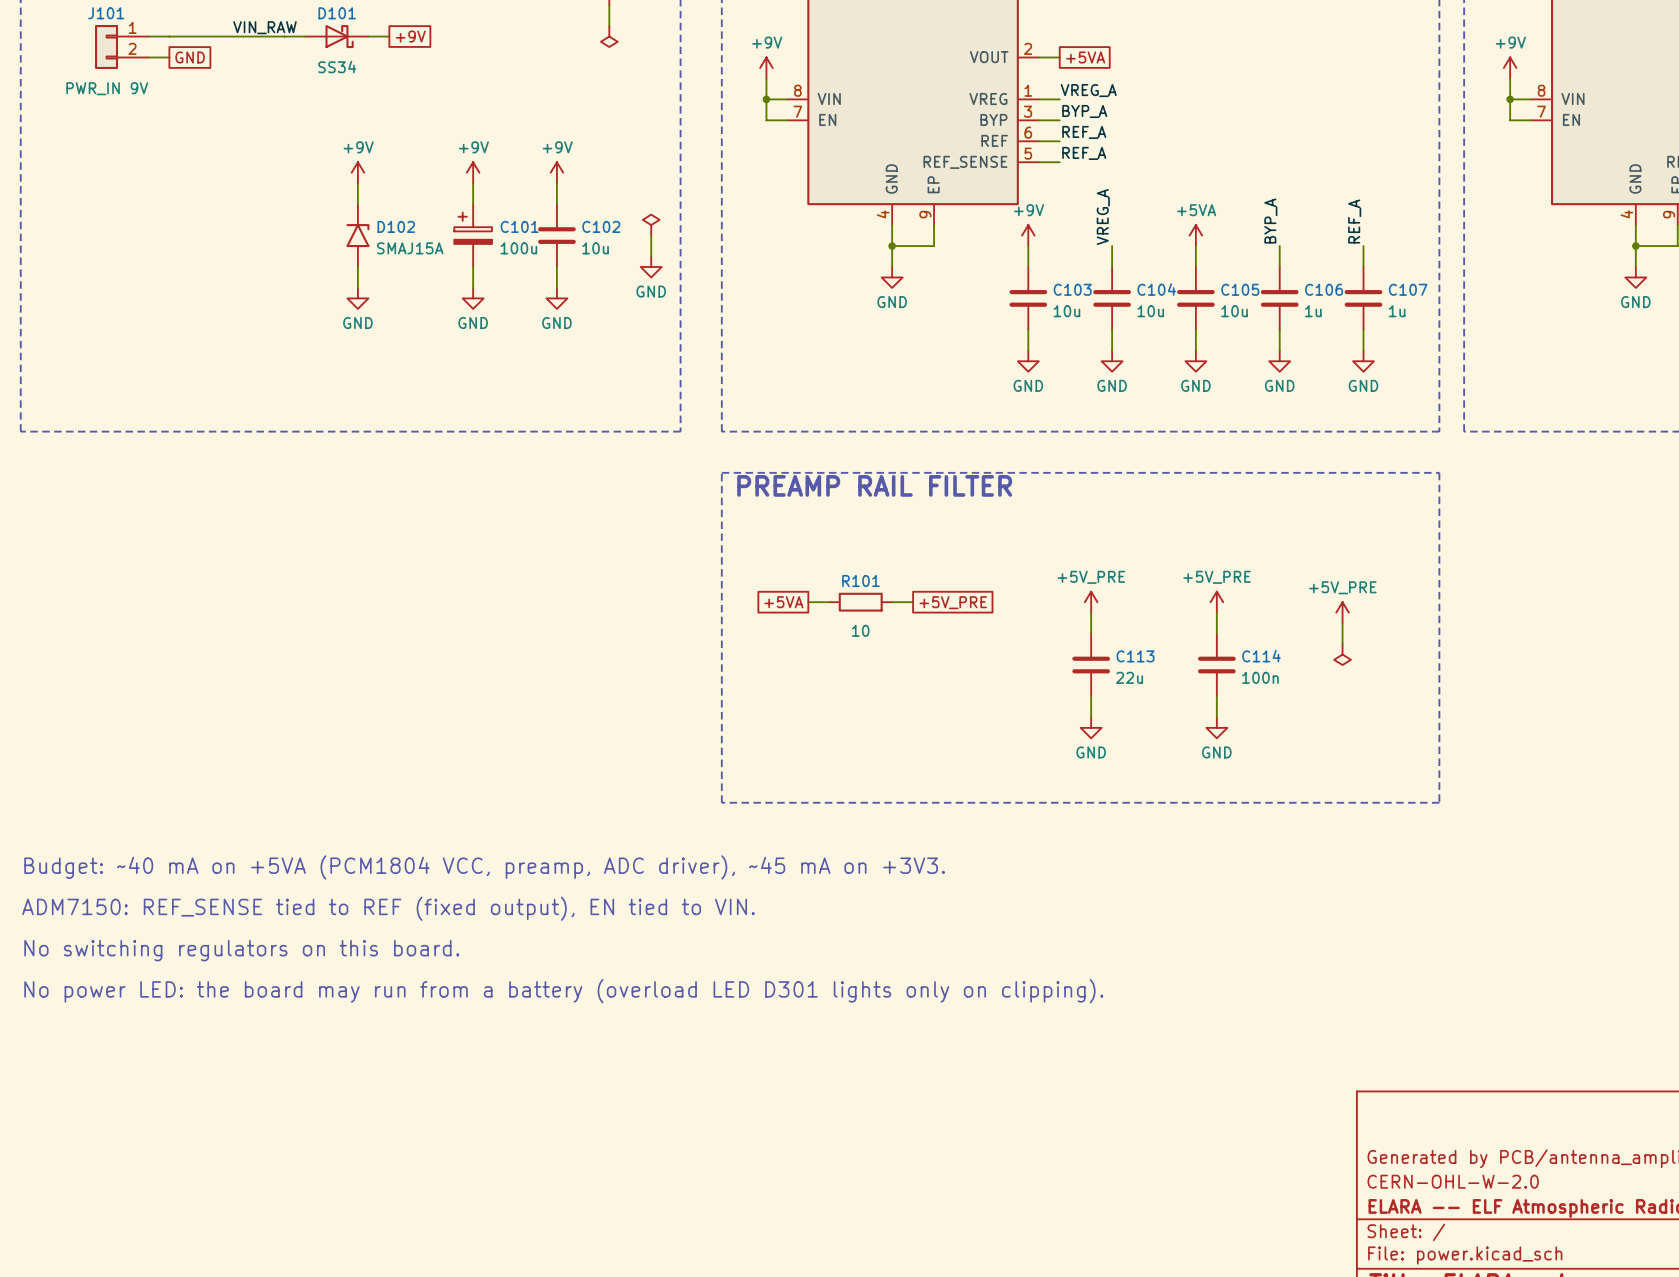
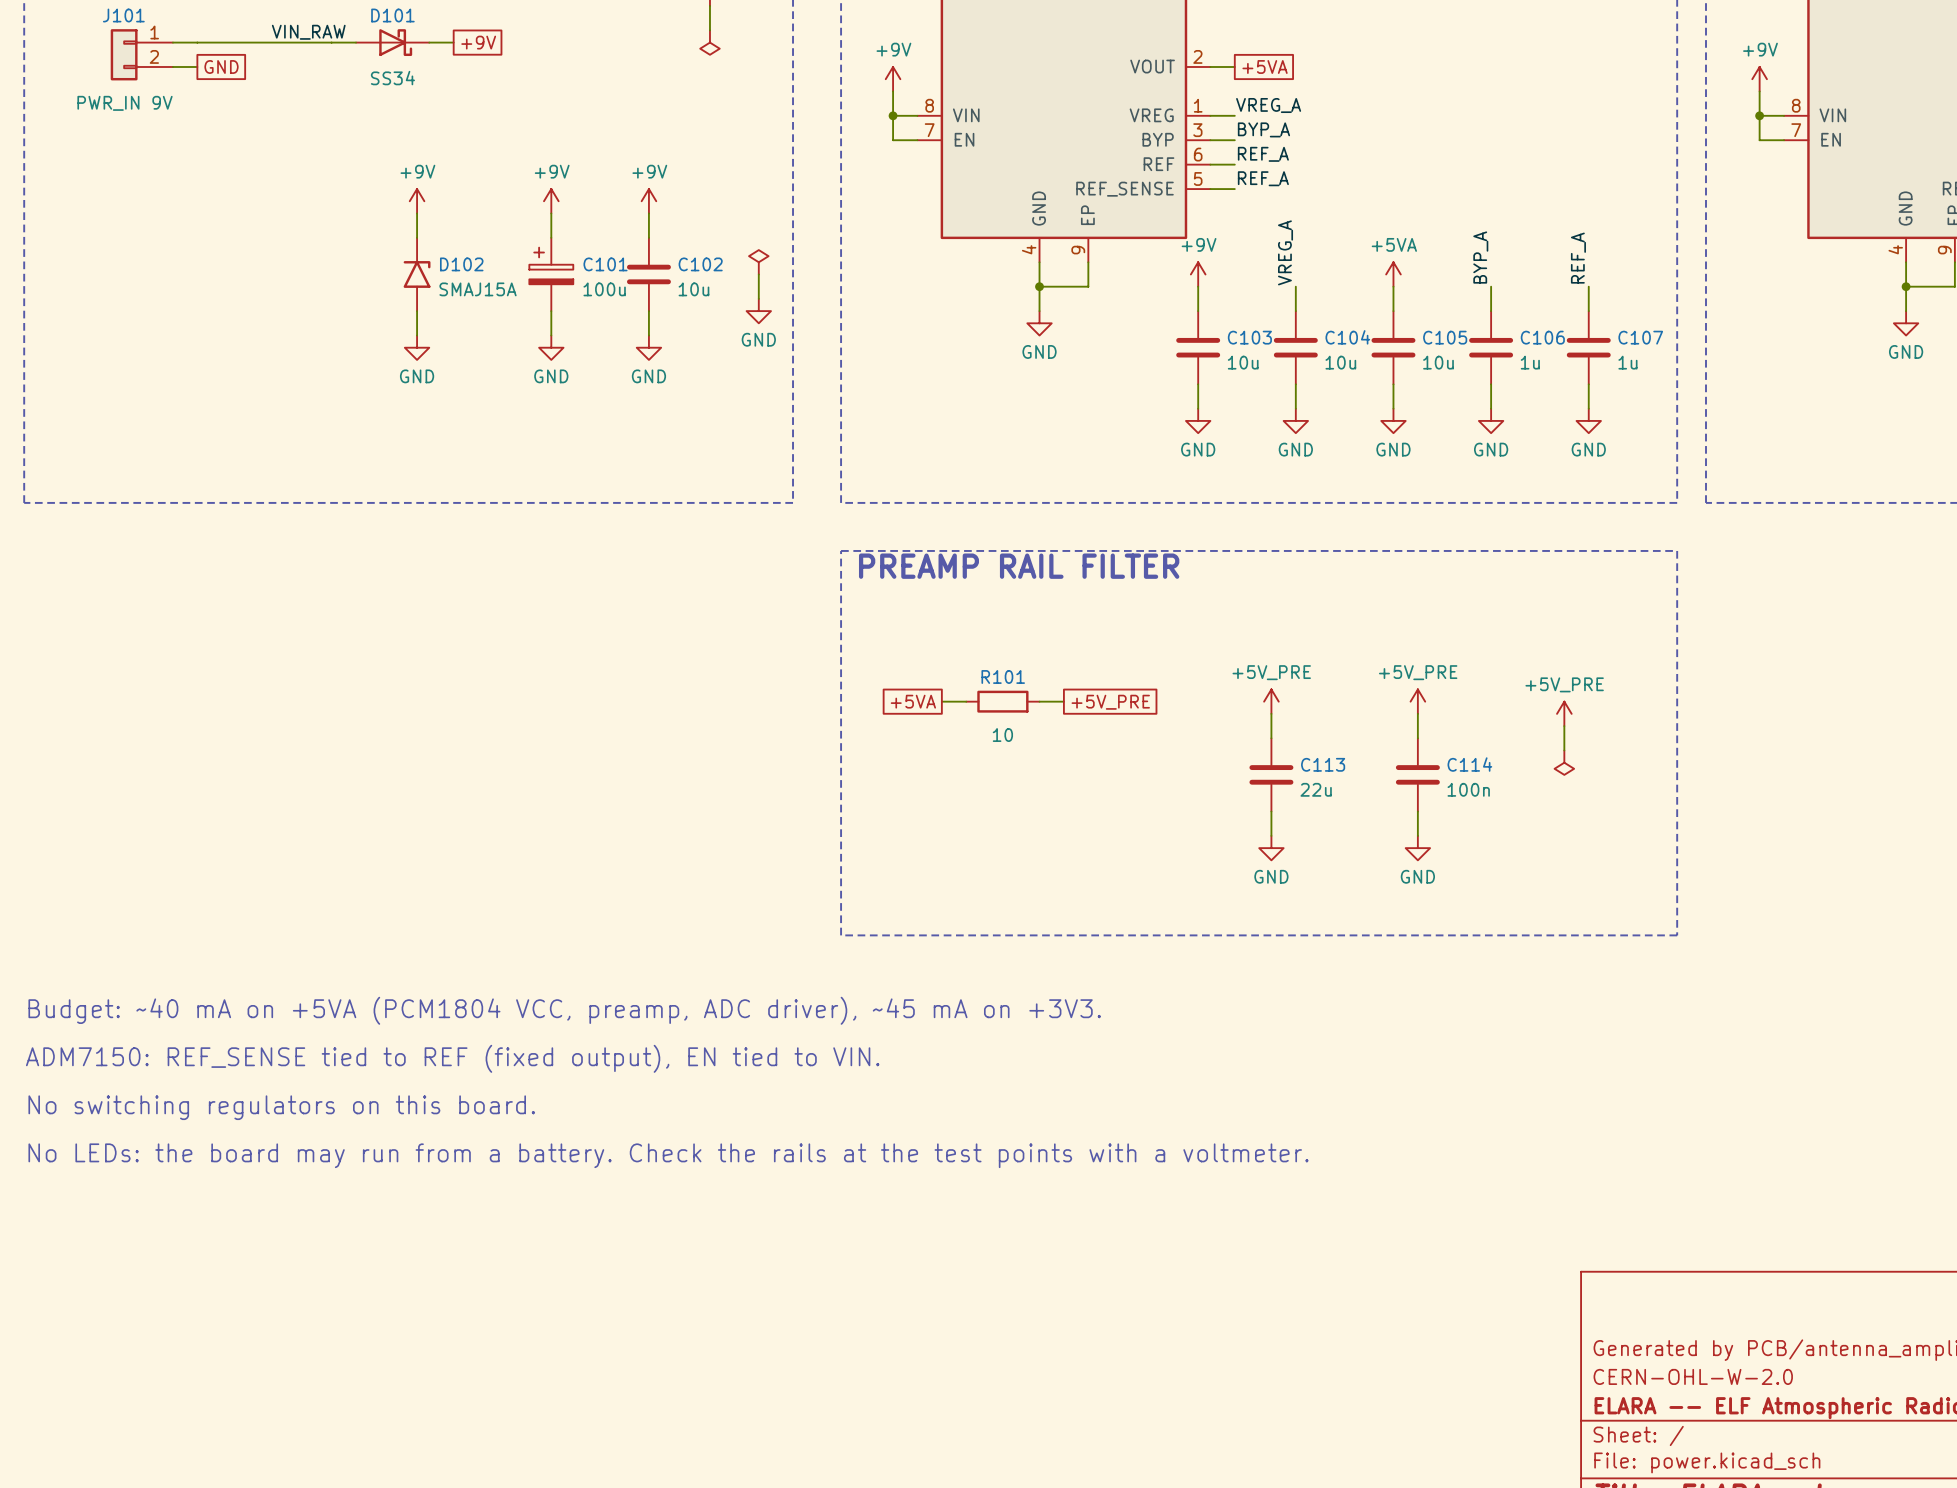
text: No power LED: the board may run from a battery (overload LED D301 lights only on clipping). (563, 991) -> No LEDs: the board may run from a battery. Check the rails at the test points with a voltmeter. (668, 1155)

